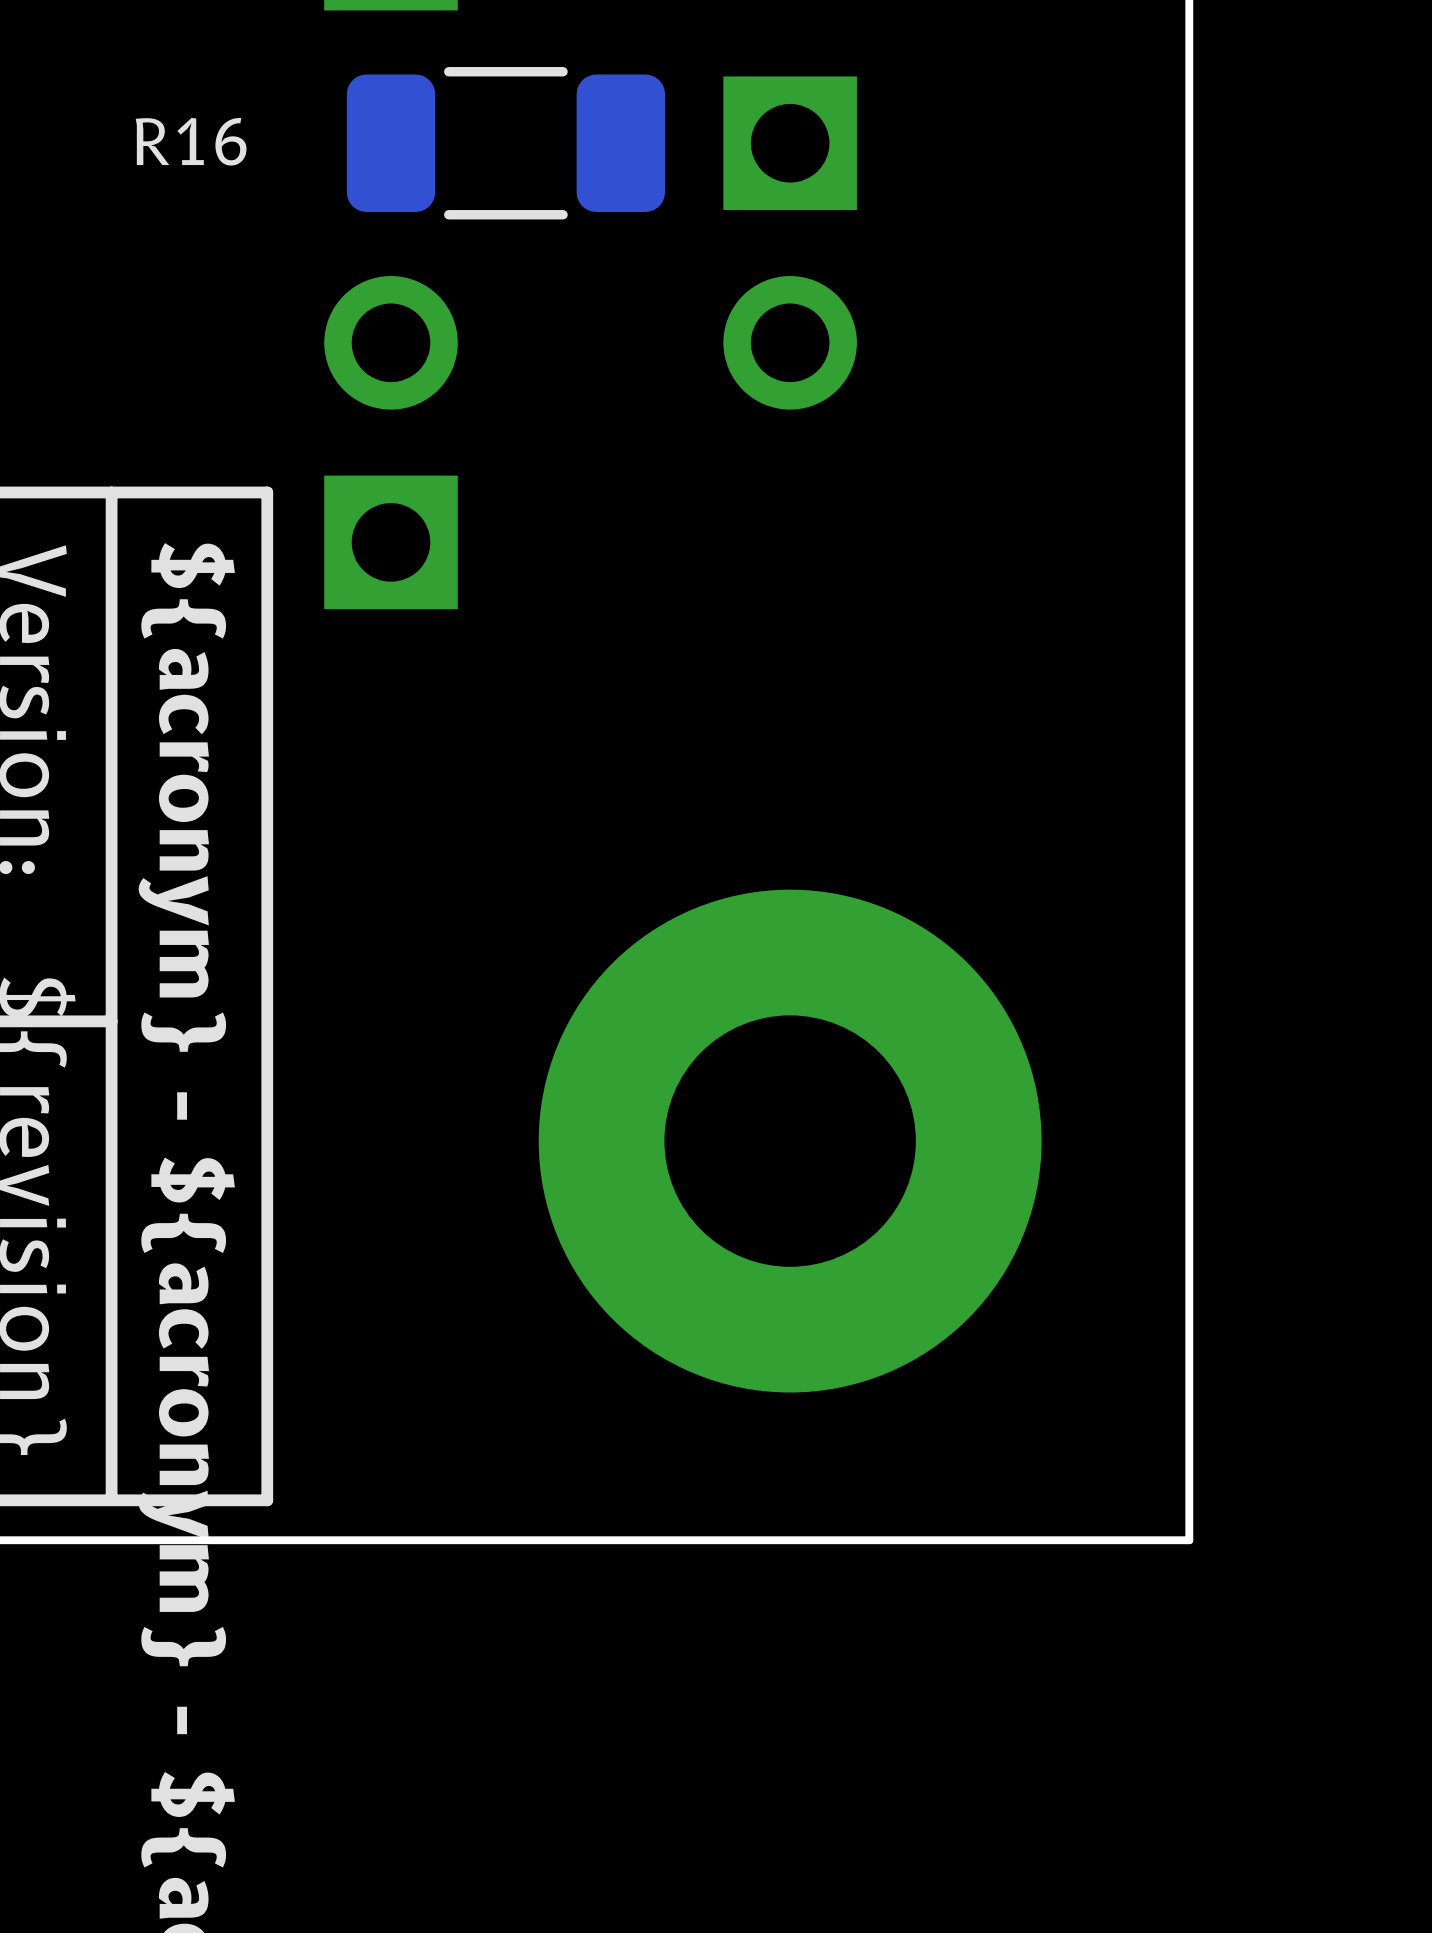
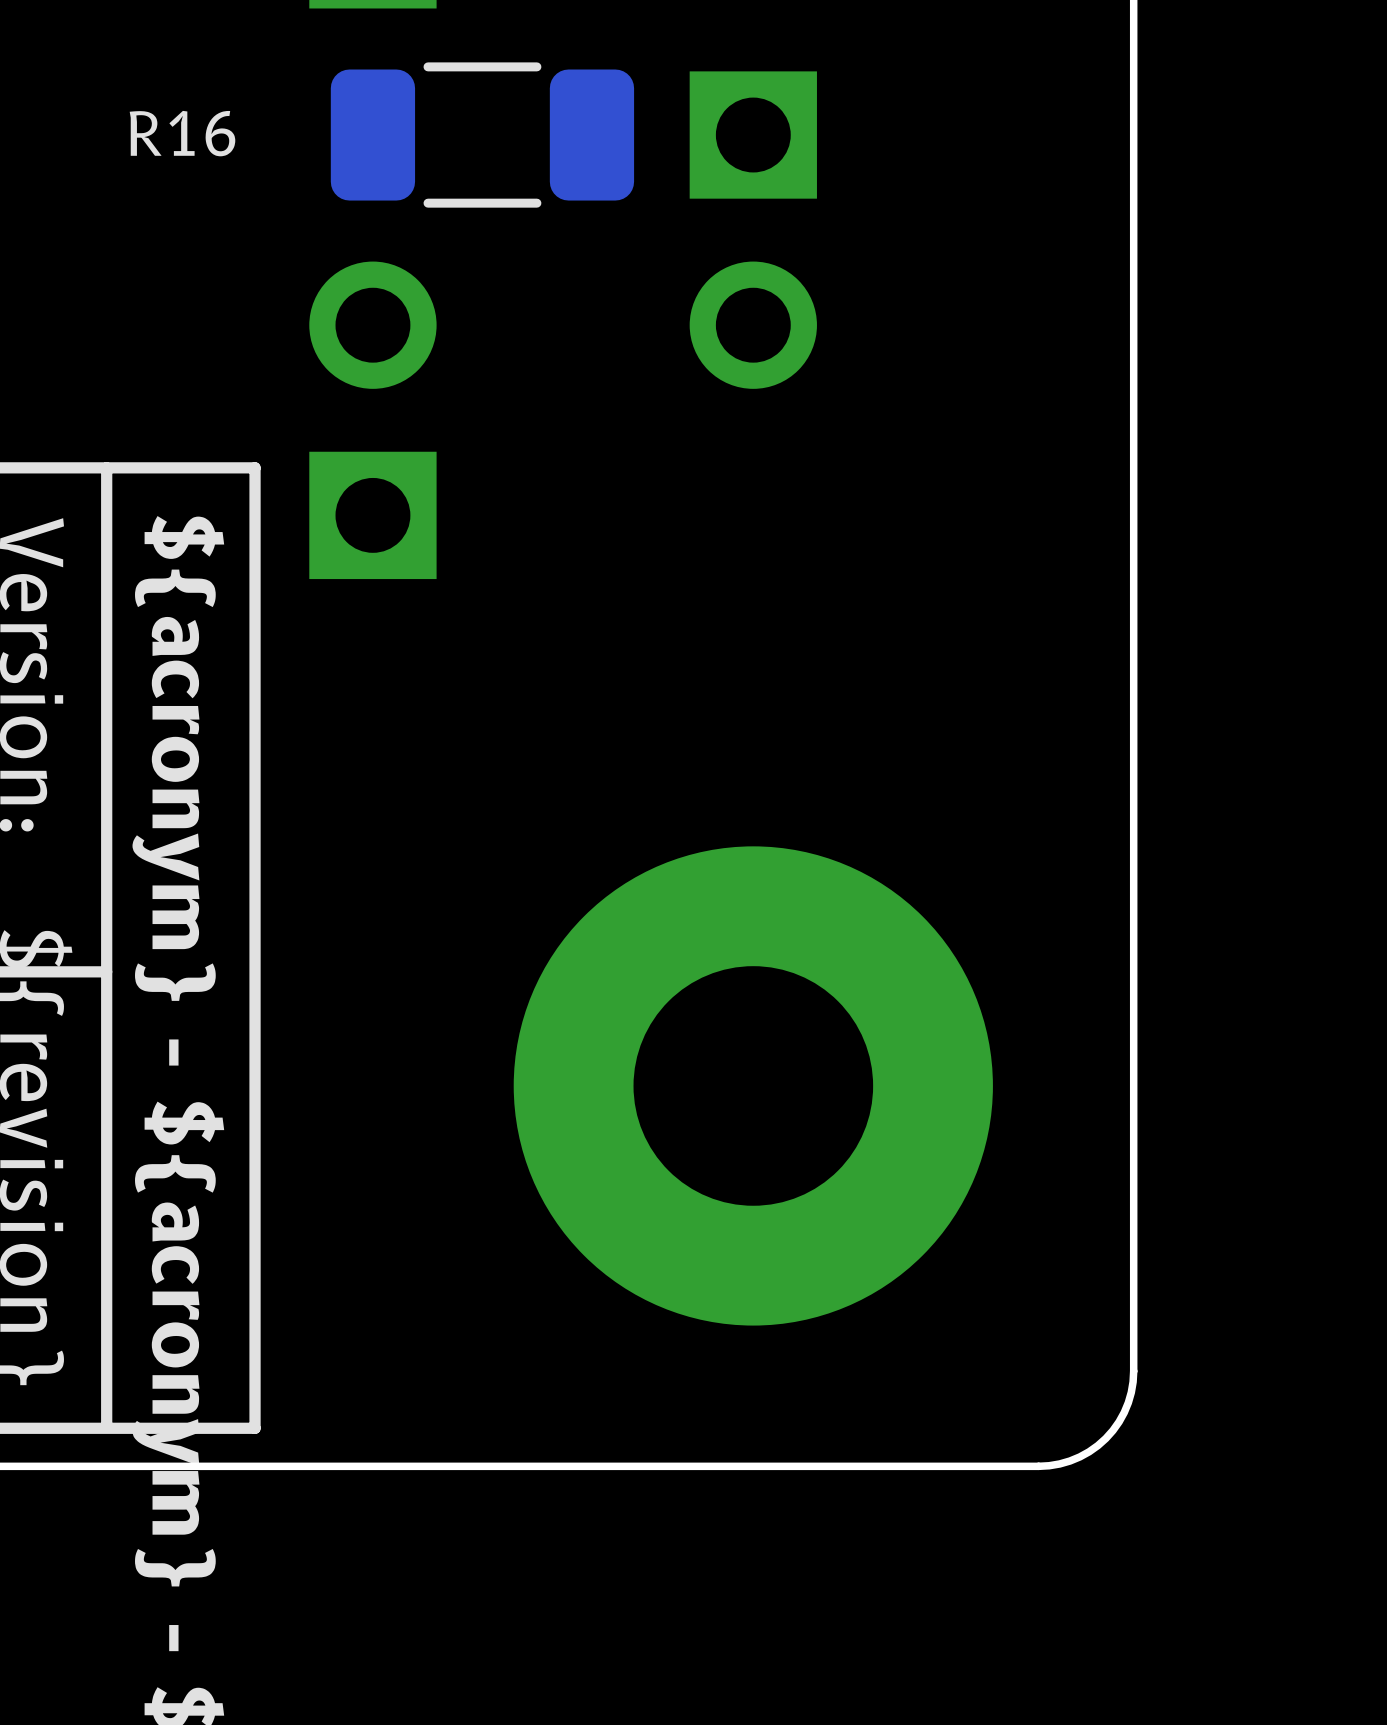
board edge: (1189, 1440) (1189, 1540) (1089, 1540) -> (1133, 1371) (1128, 1402) (1119, 1421) (1105, 1438) (1079, 1456) (1059, 1463) (1038, 1466)

